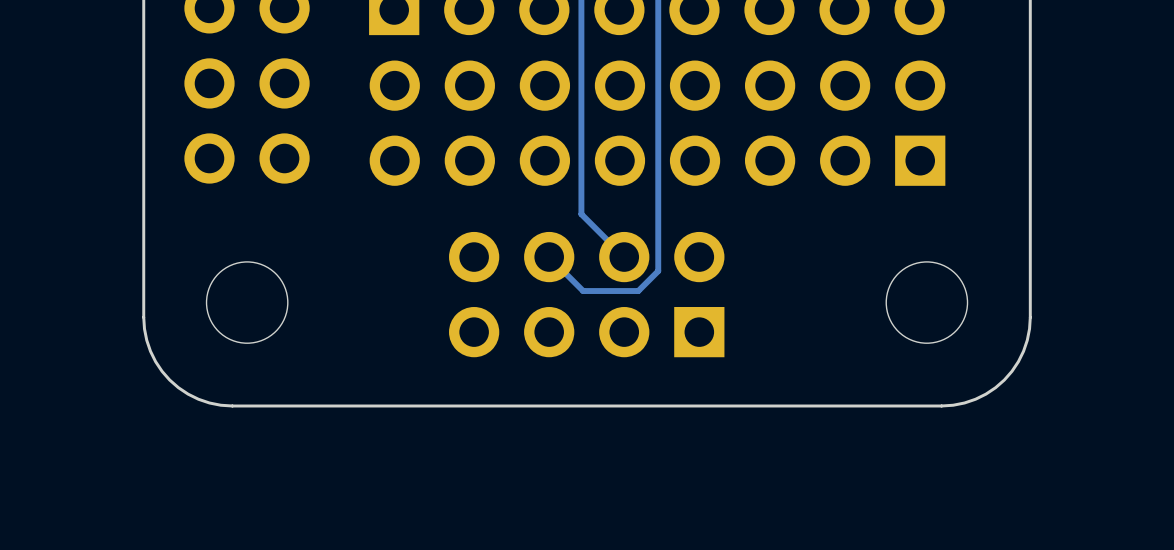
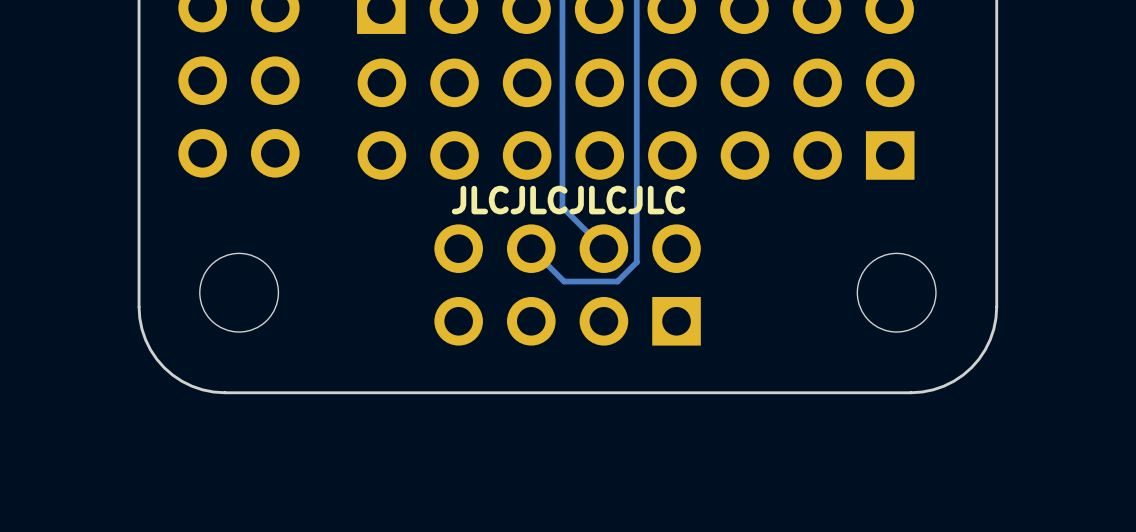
text: none -> JLCJLCJLCJLC (568, 200)

